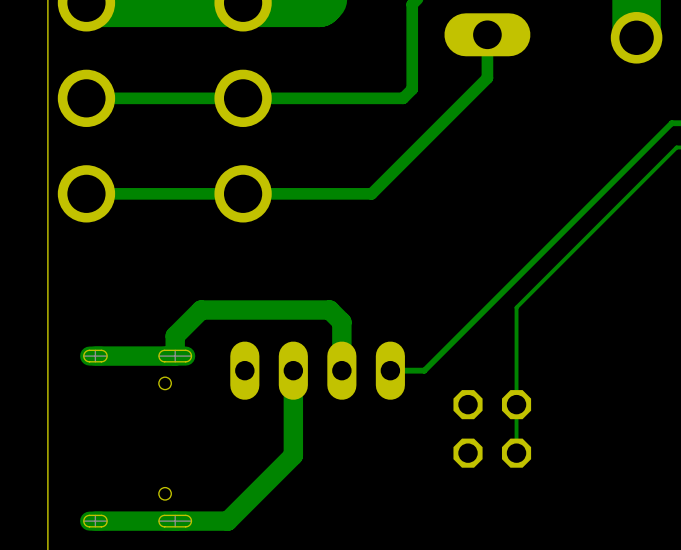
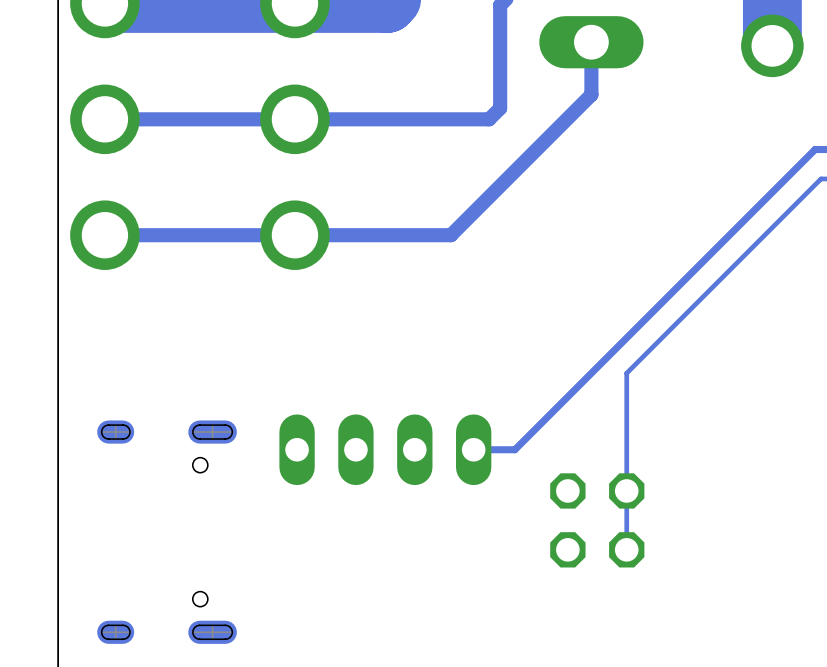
track: (95, 356) (175, 356) (175, 335) (201, 310) (329, 310) (341, 322) (341, 370) -> none
track: (293, 370) (293, 455) (227, 521) (95, 521) -> none

